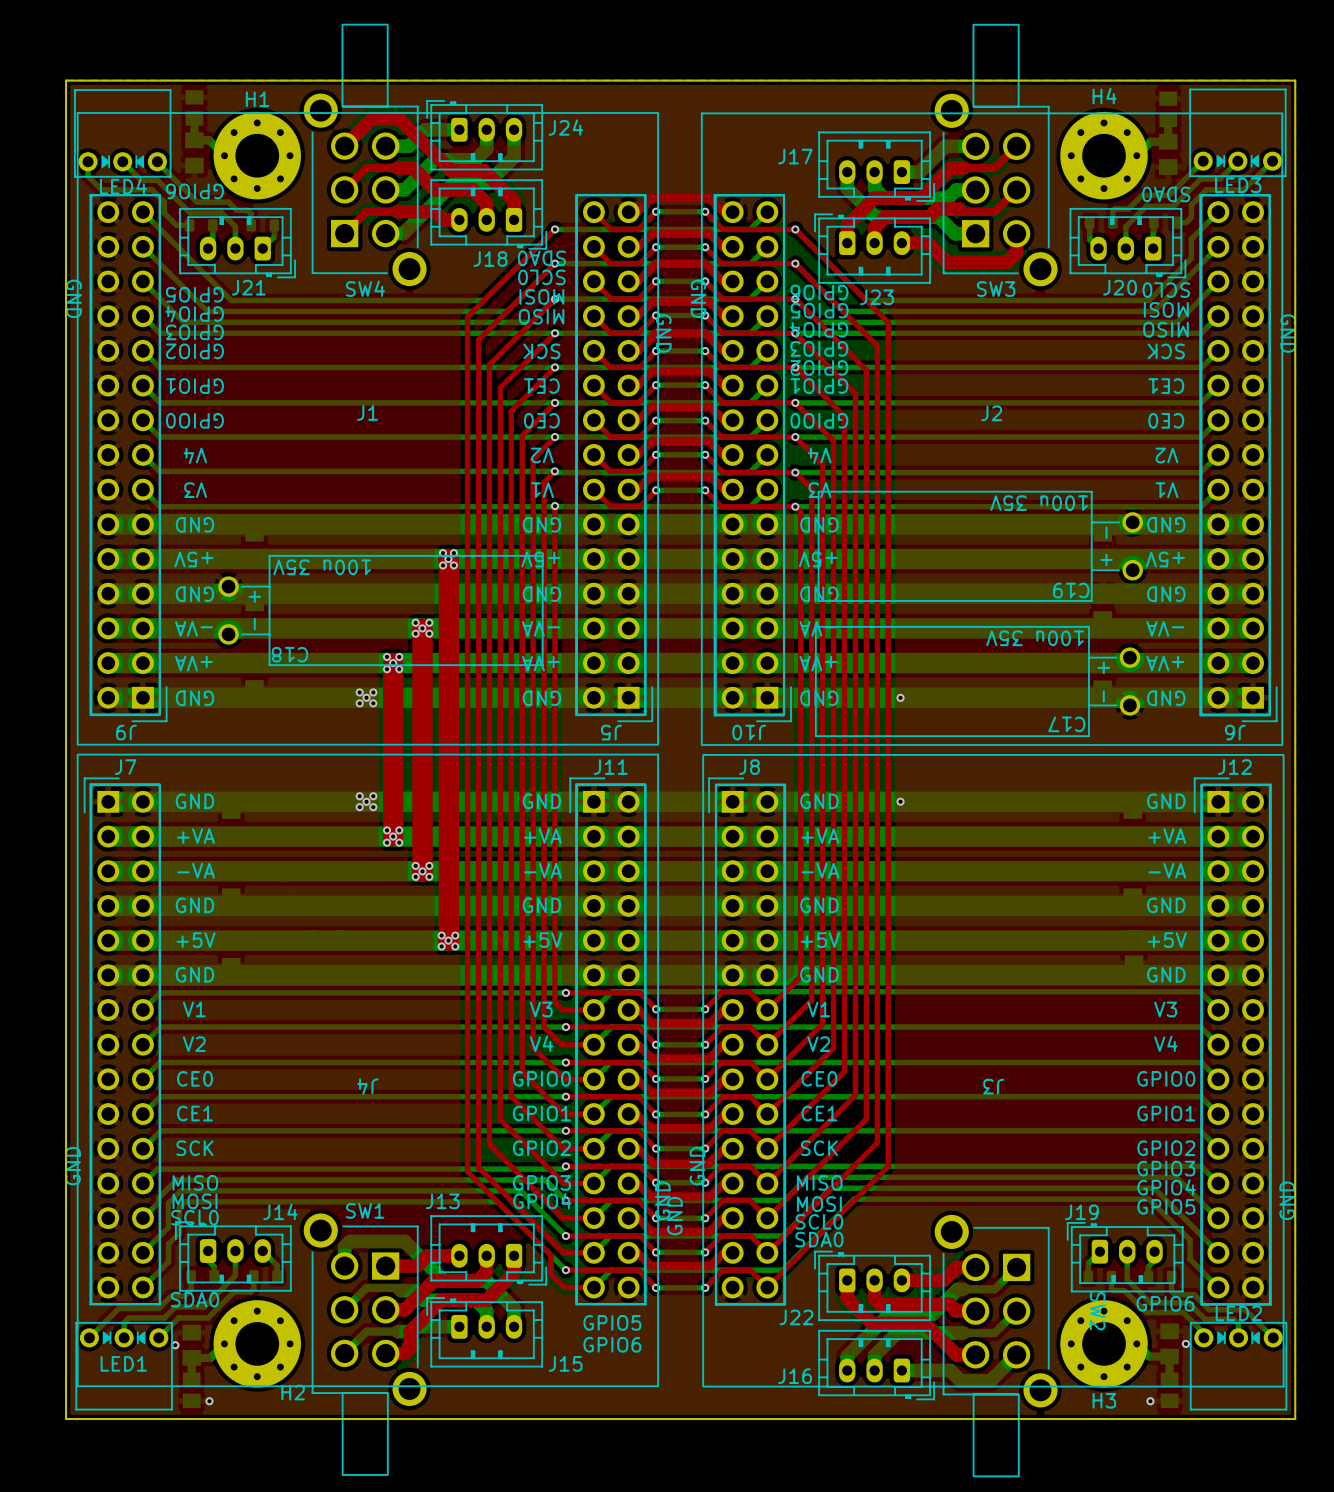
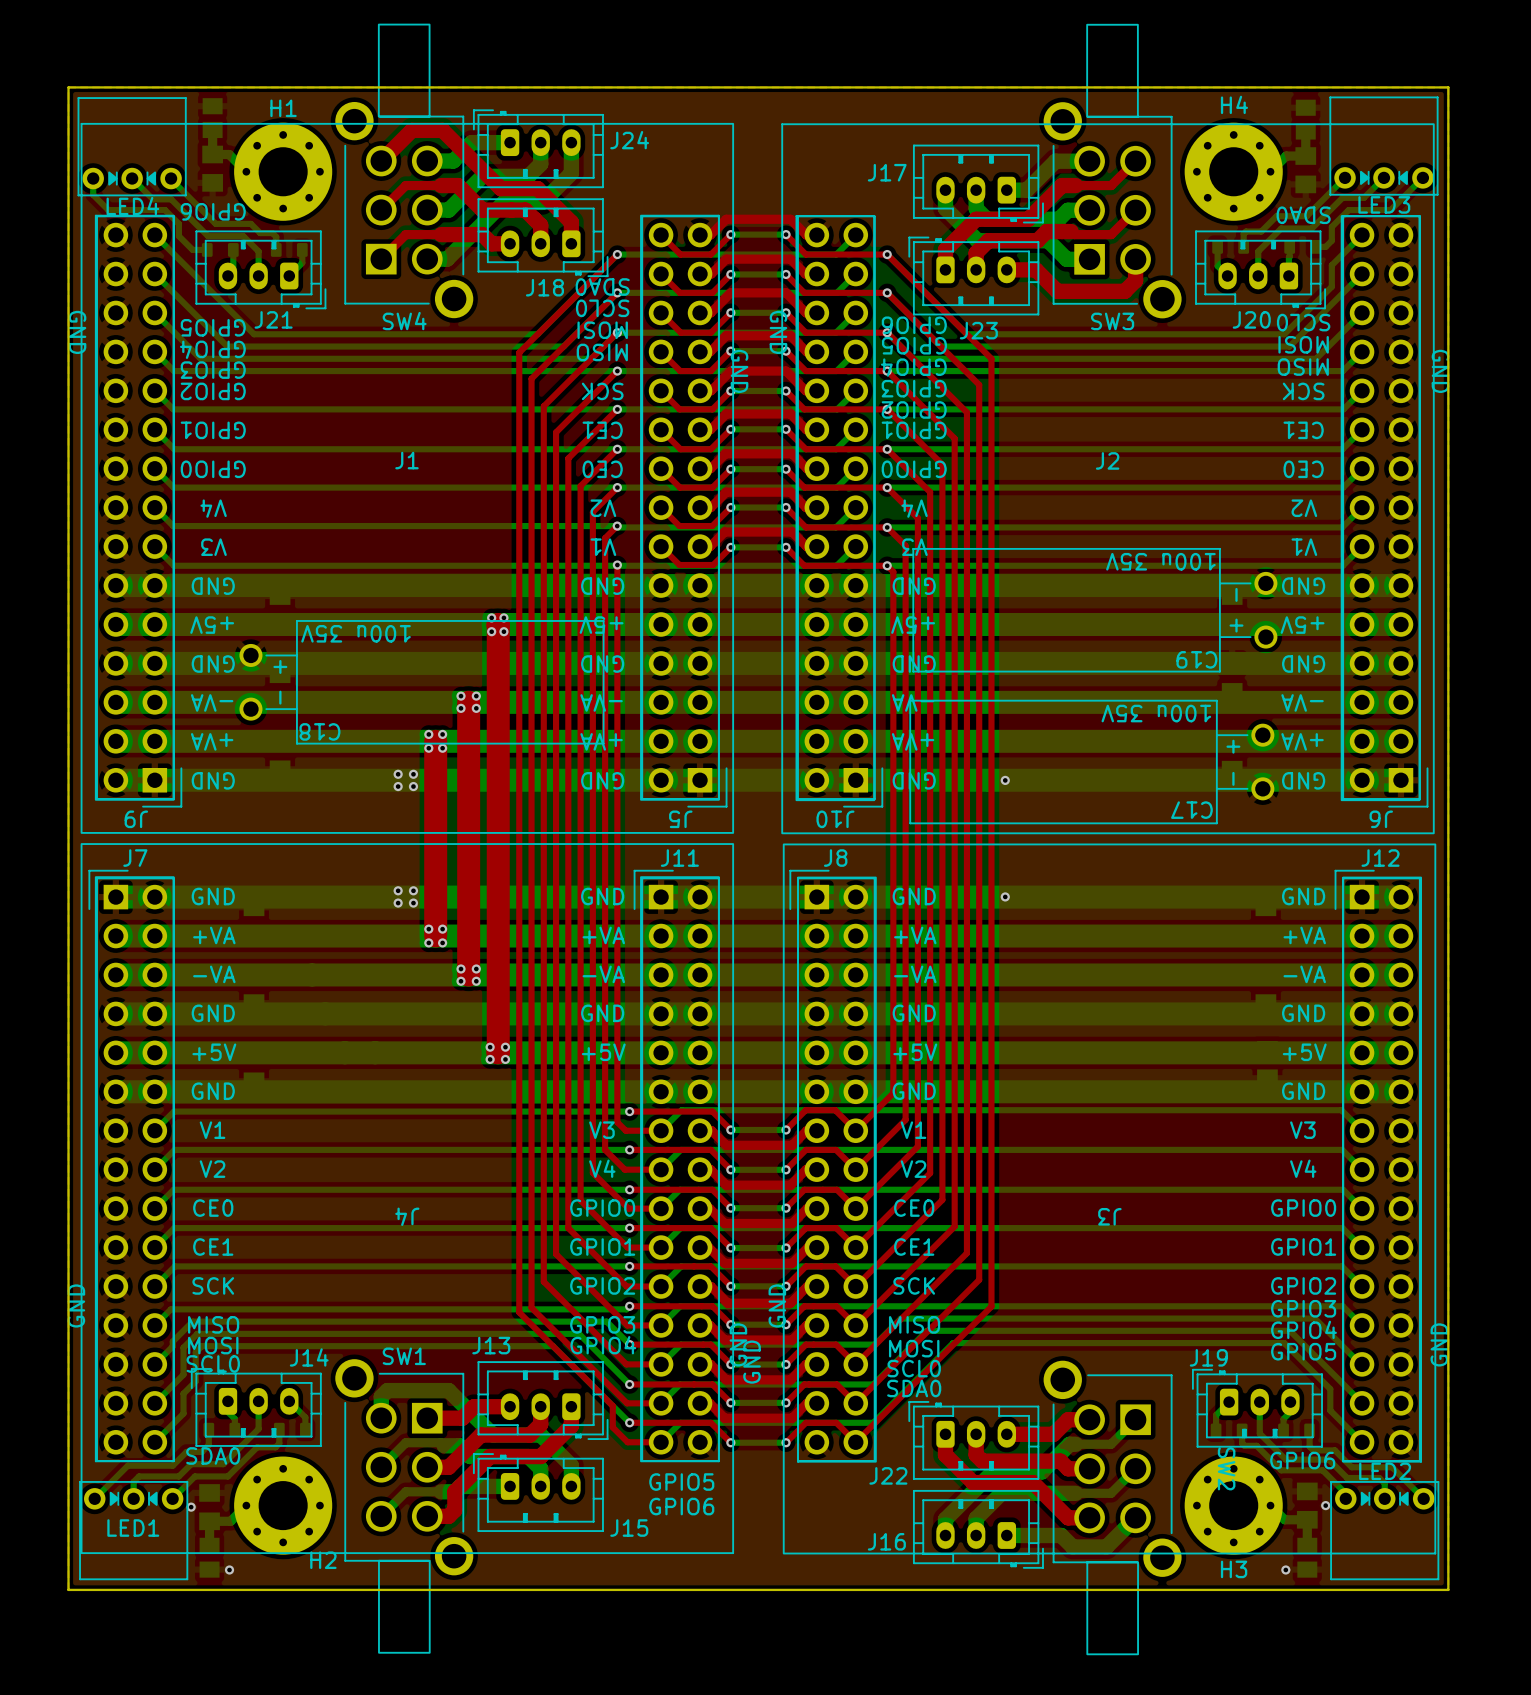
via: (448, 559) -> none
via: (422, 628) -> none
via: (393, 663) -> none
via: (366, 697) -> none
via: (366, 801) -> none
via: (393, 836) -> none
via: (422, 871) -> none
via: (448, 940) -> none

